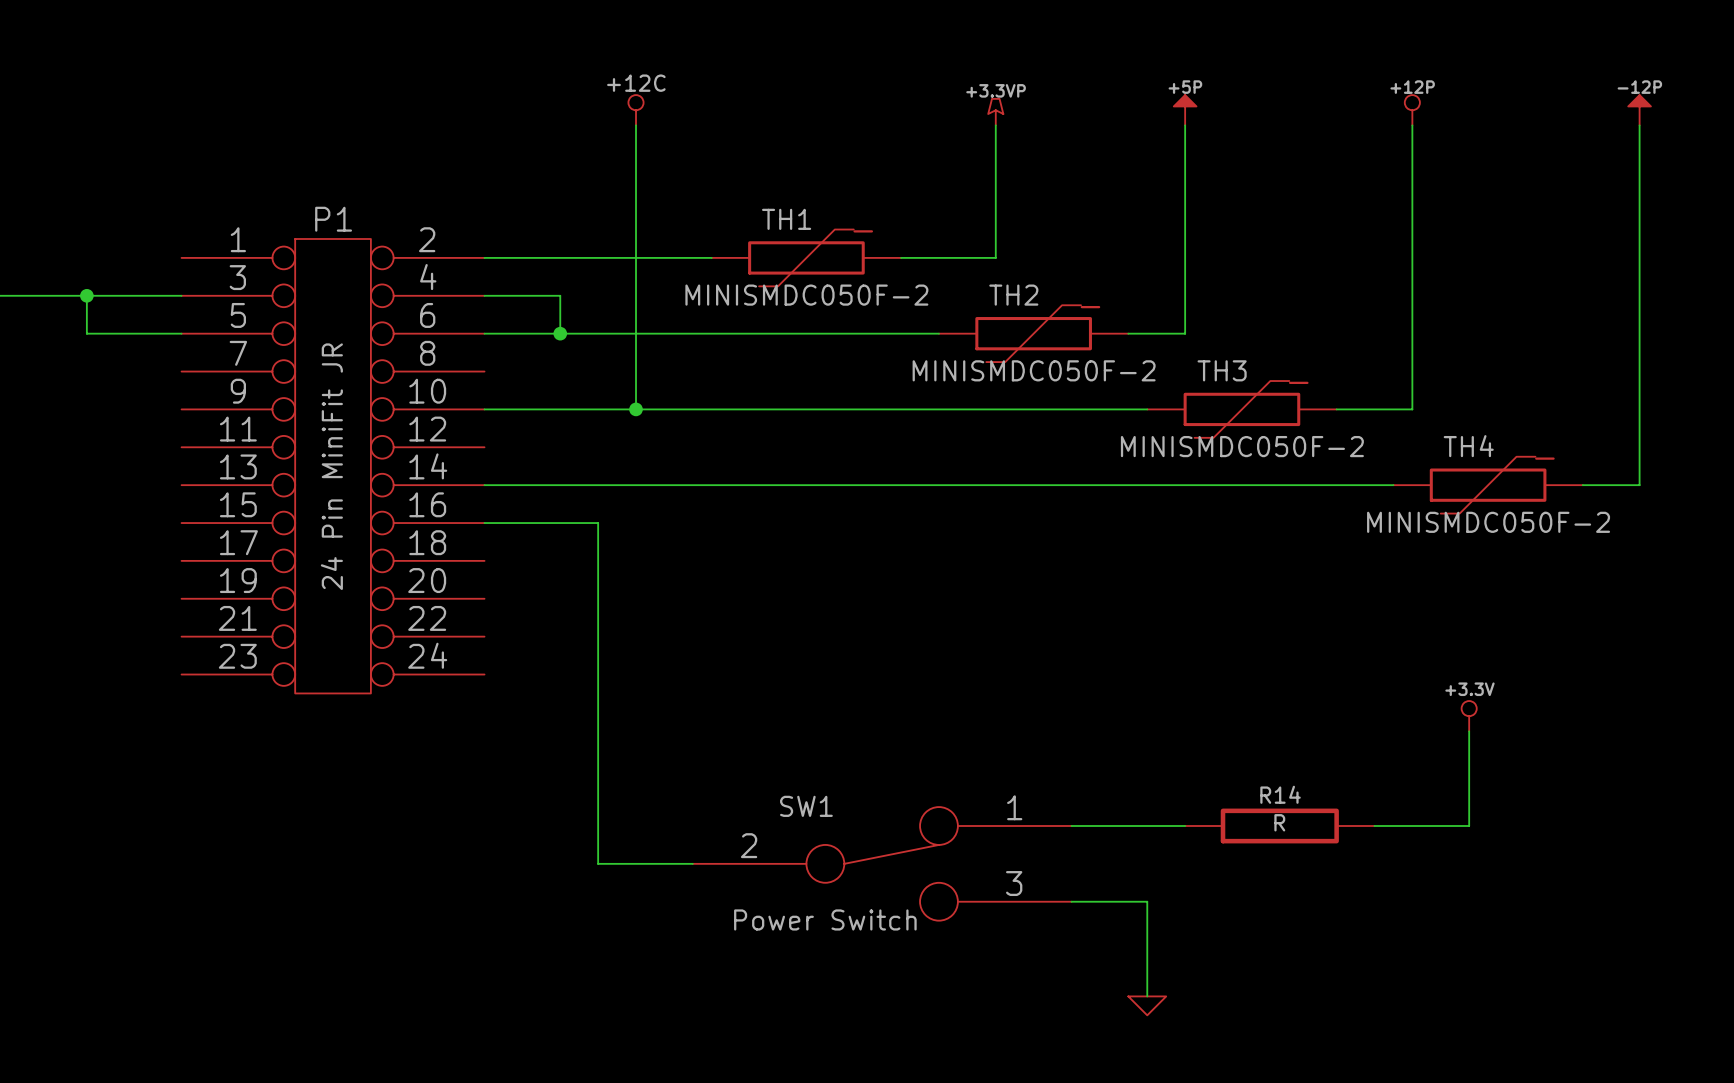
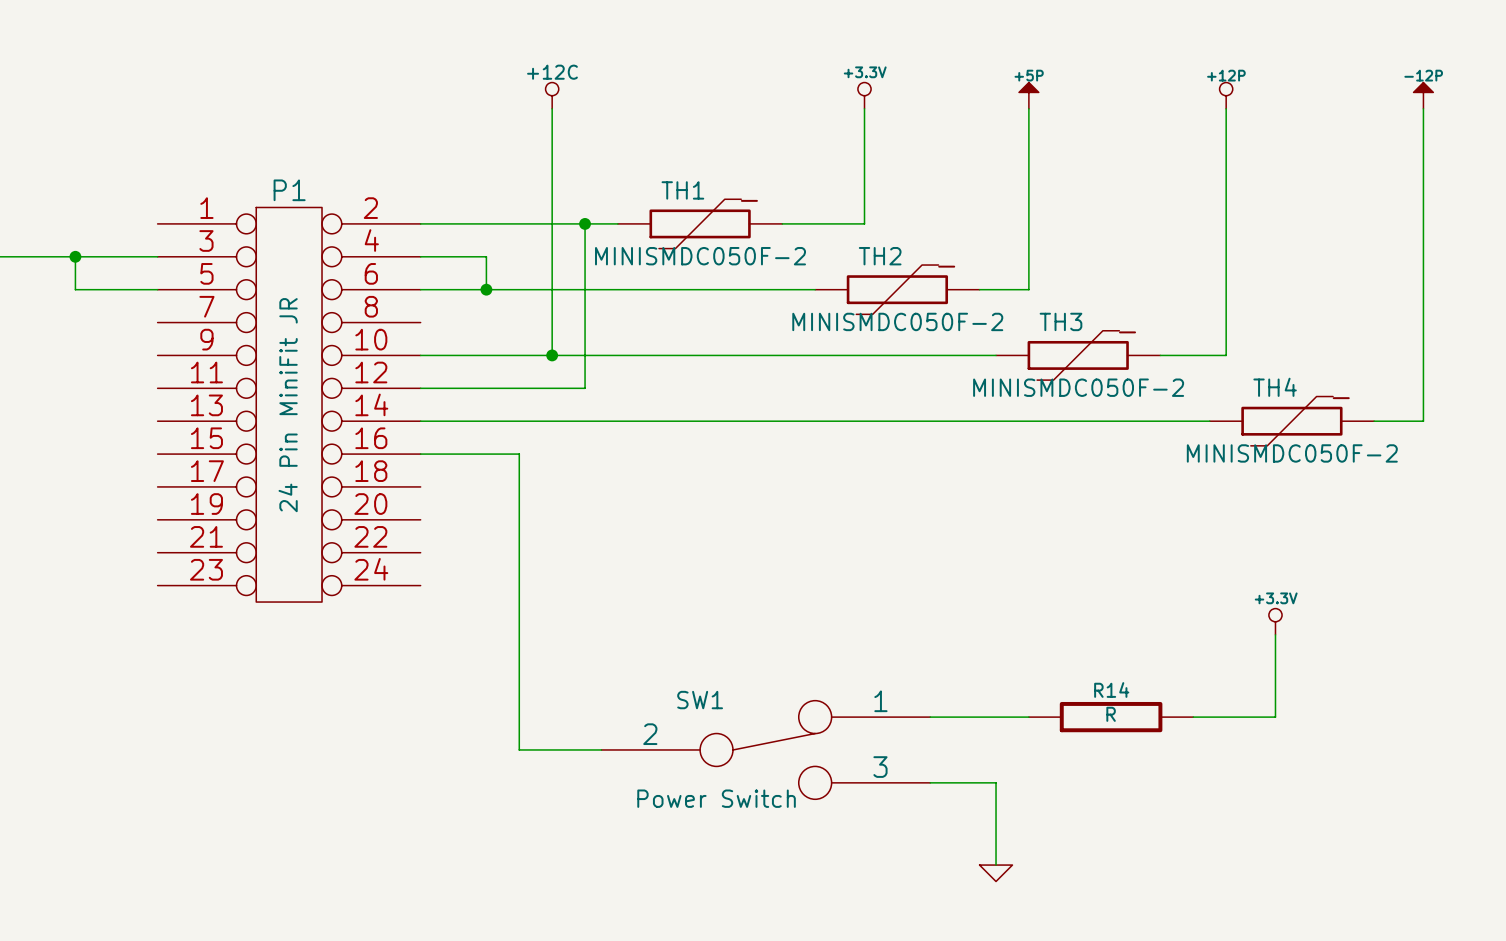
power symbol: +3.3VP (995, 112) -> +3.3V (864, 95)
wire: none -> (585, 223) (585, 388) (420, 388)
junction: none -> (585, 223)

